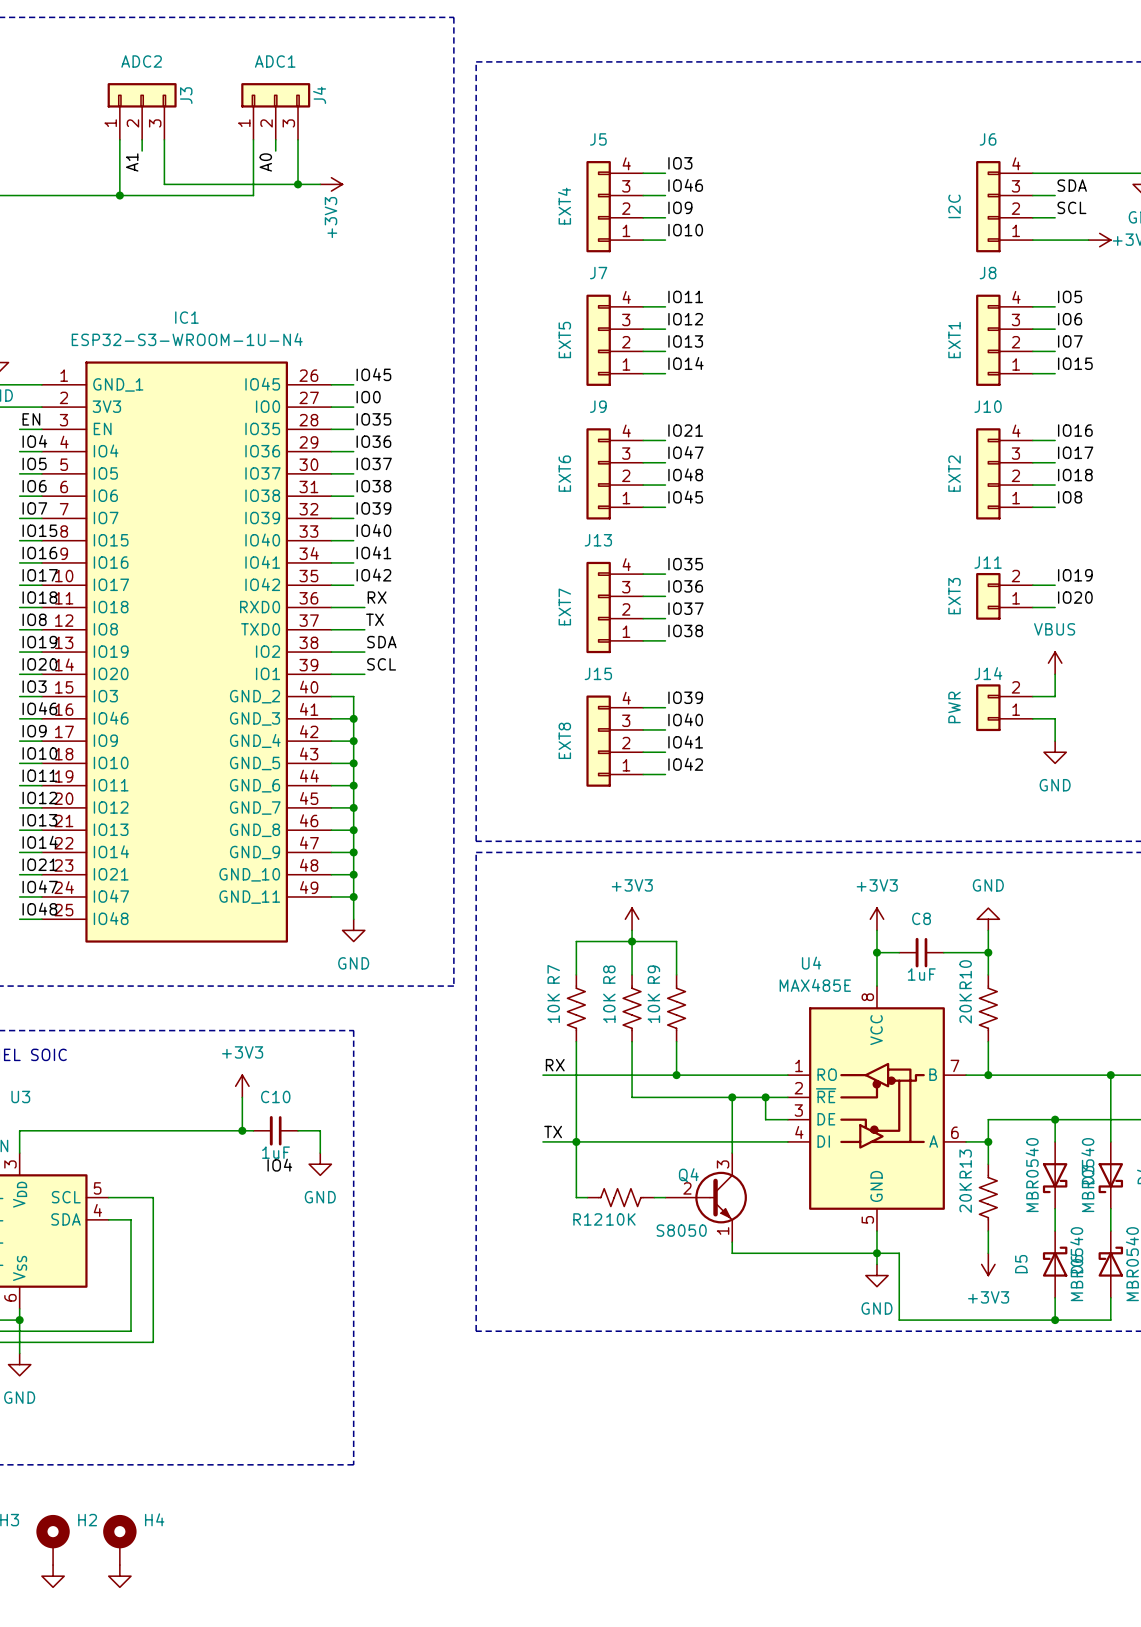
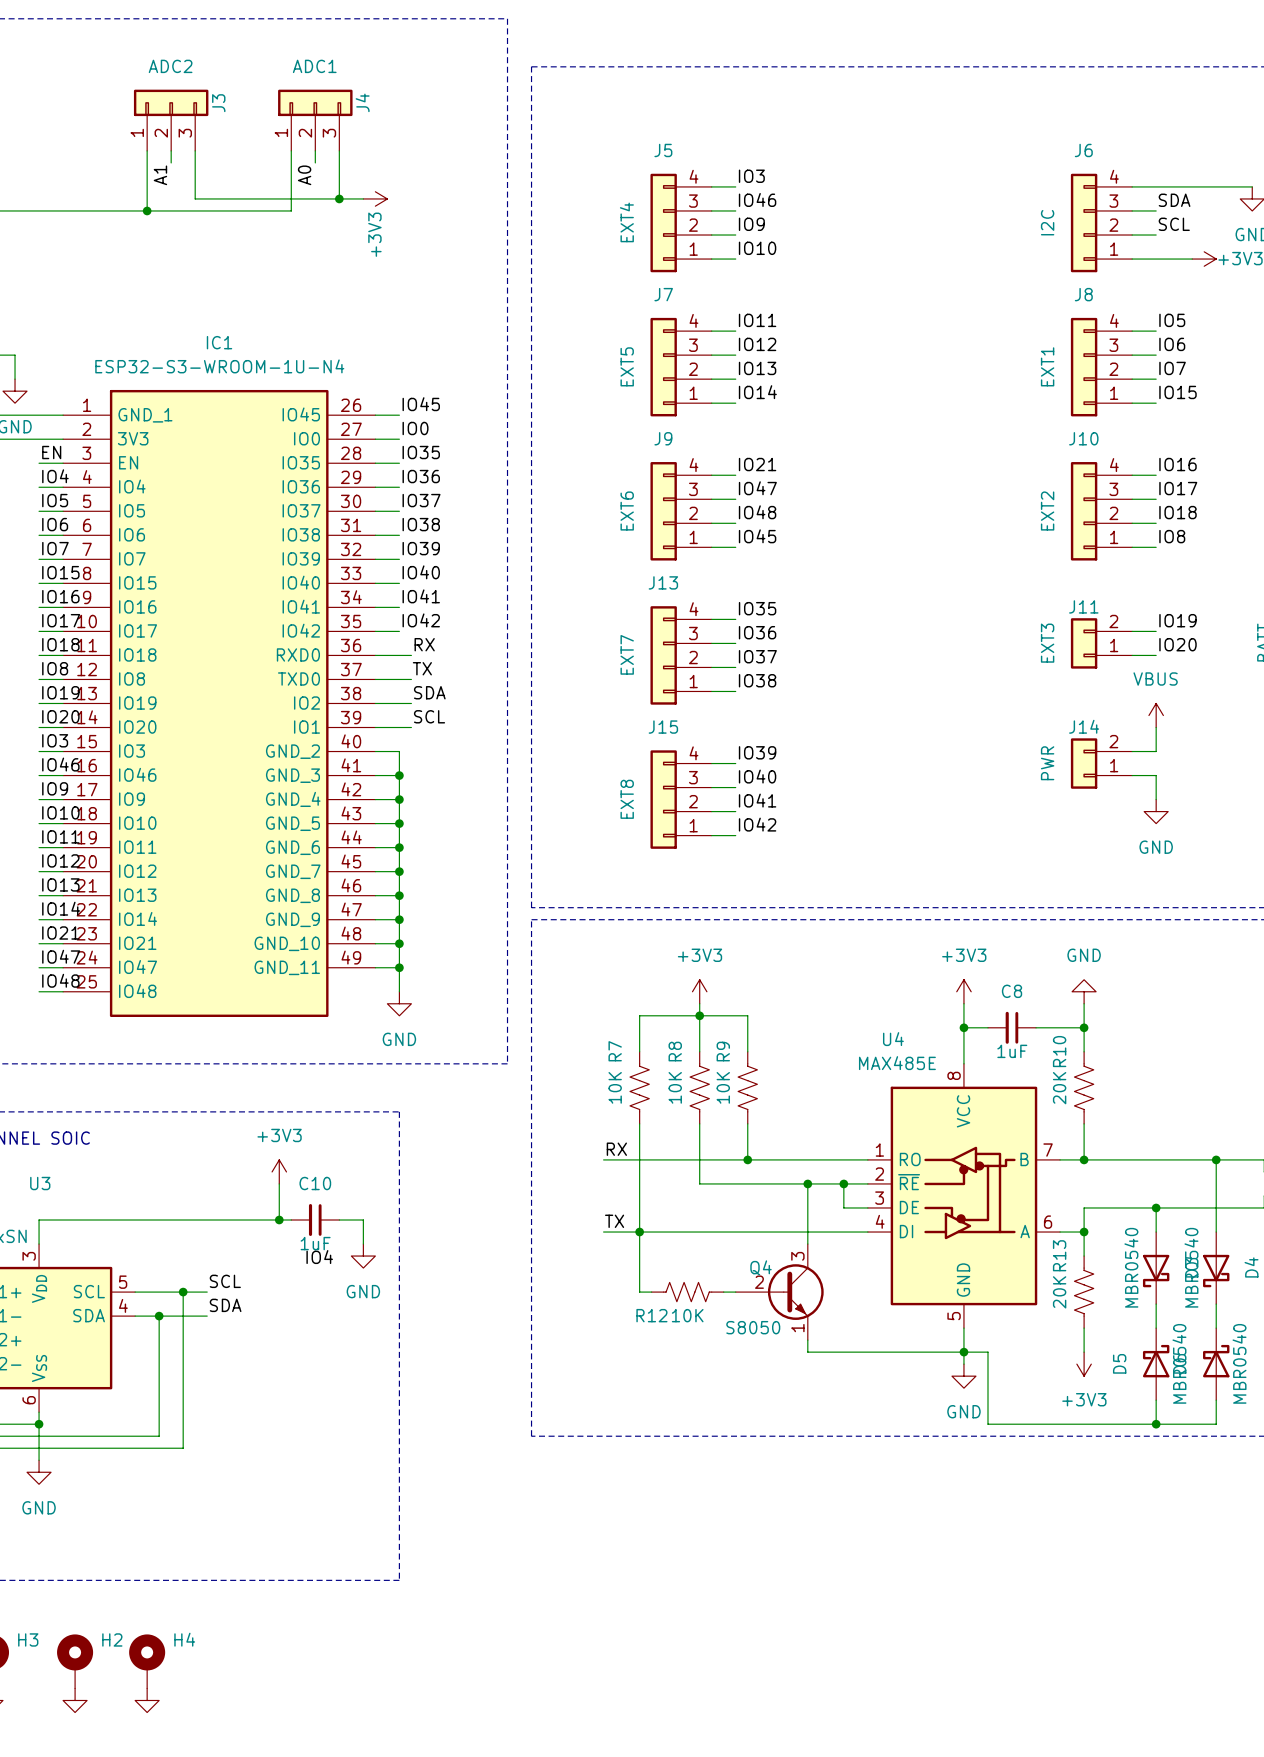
label: none -> SCL (225, 1281)
wire: none -> (183, 1292) (207, 1292)
junction: none -> (183, 1292)
label: none -> SDA (225, 1305)
wire: none -> (159, 1316) (207, 1316)
junction: none -> (159, 1316)

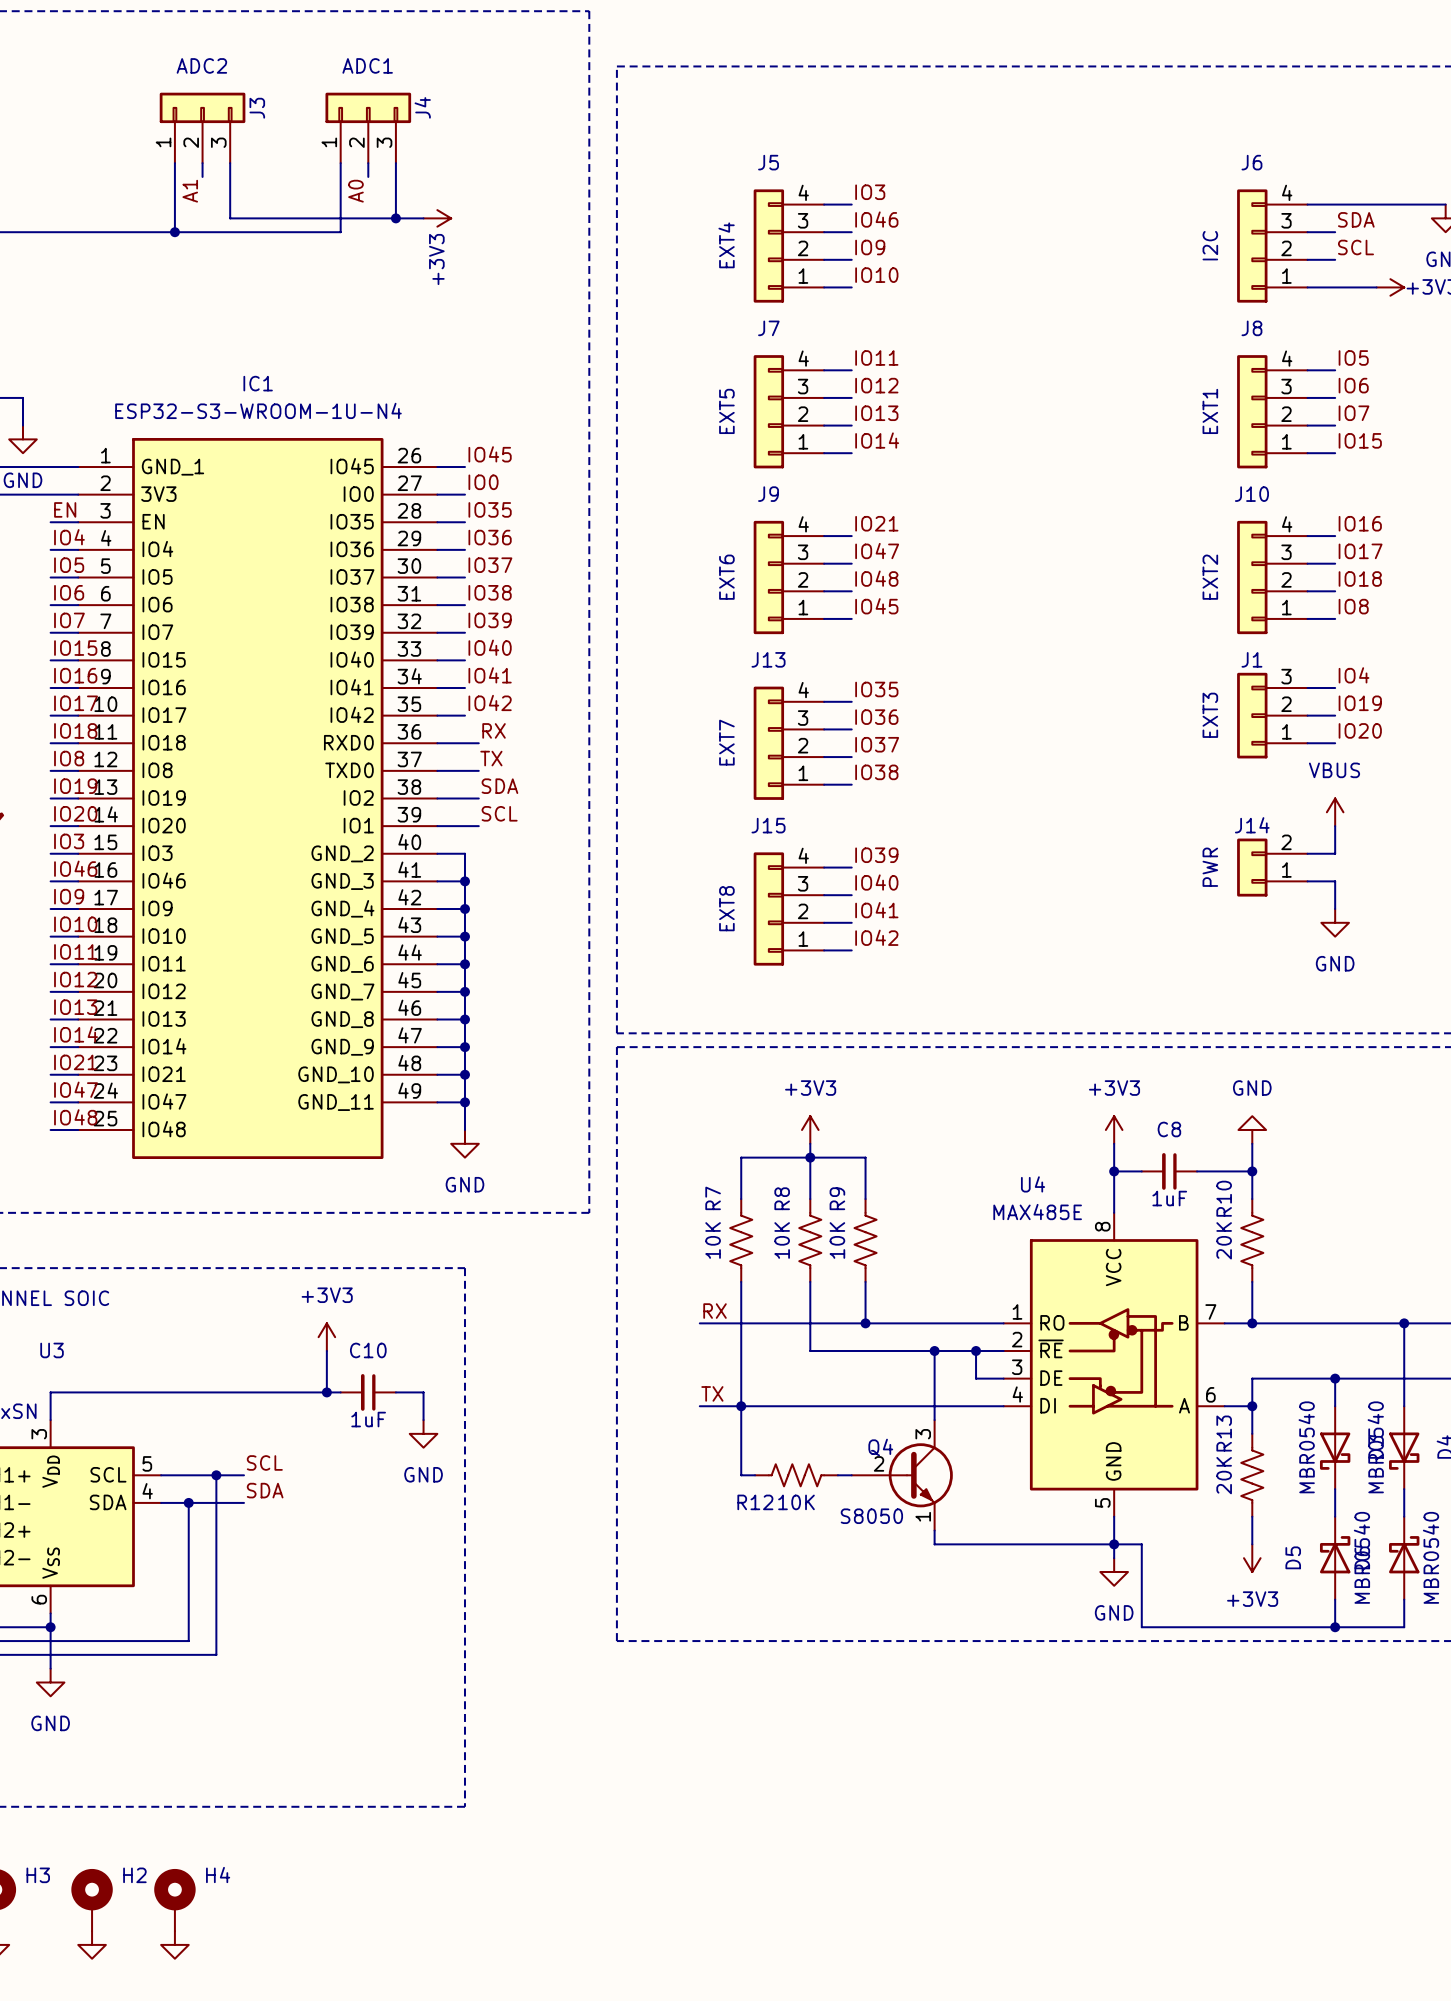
label: none -> IO4 (1354, 675)
wire: none -> (1307, 688) (1335, 688)
J1: none -> EXT3 (1272, 715)
J11: EXT3 (1101, 643) -> none
label: IO4 (319, 1257) -> none

